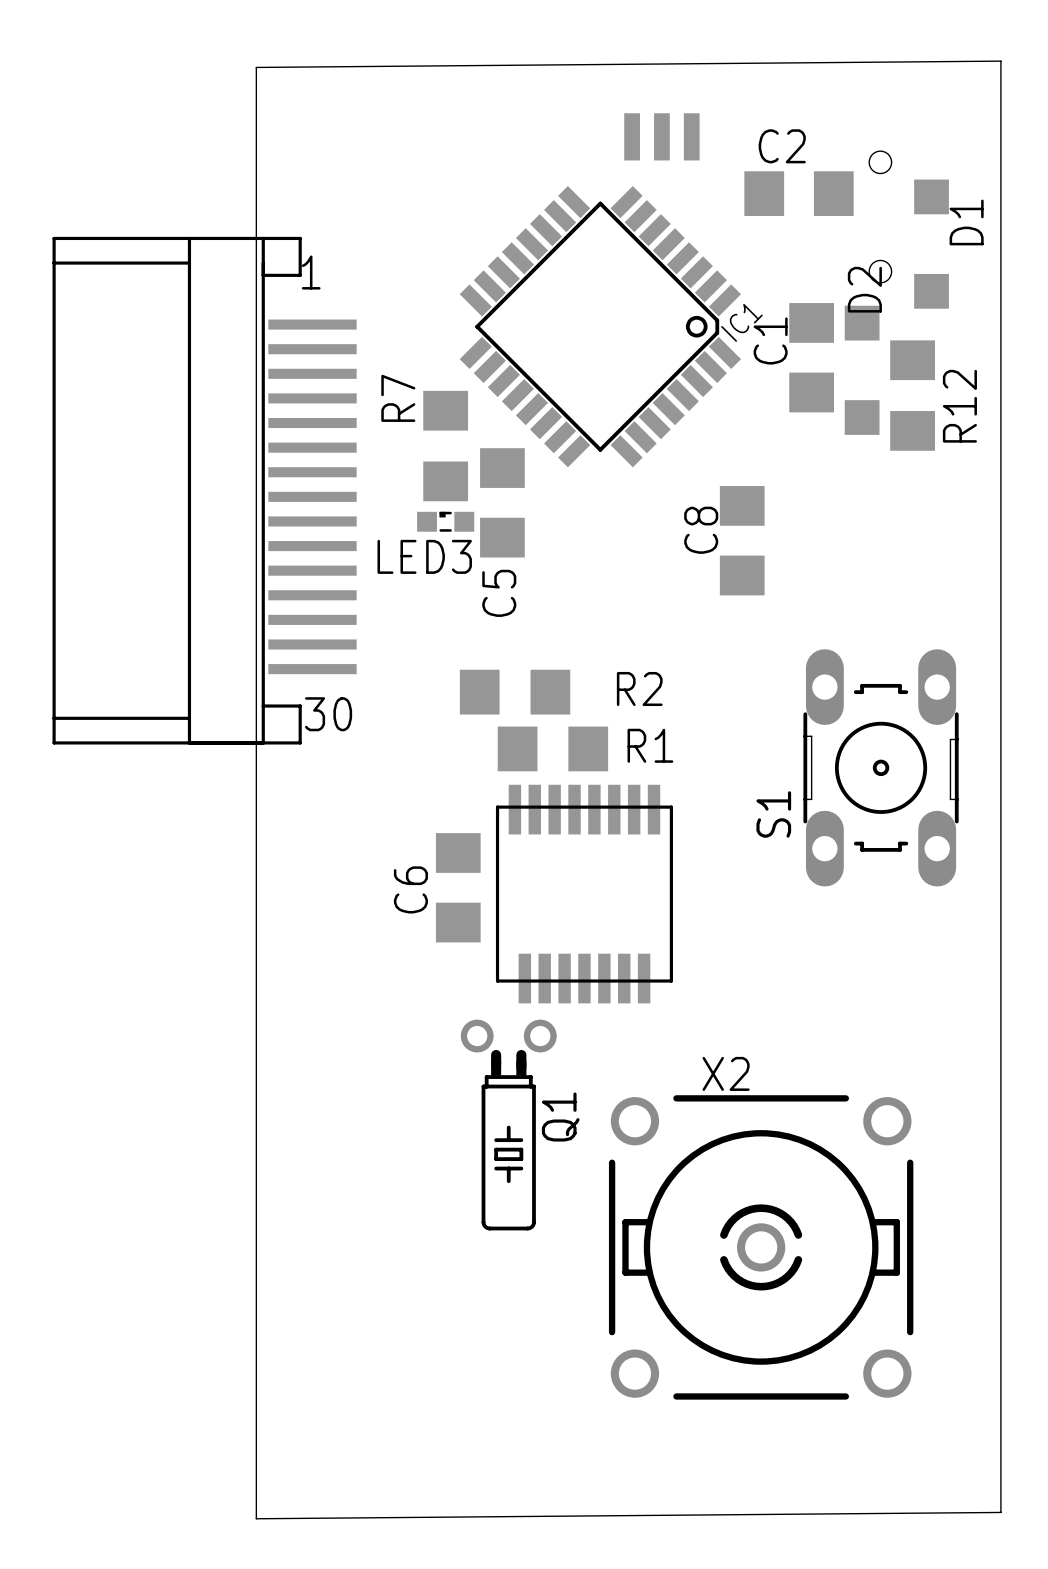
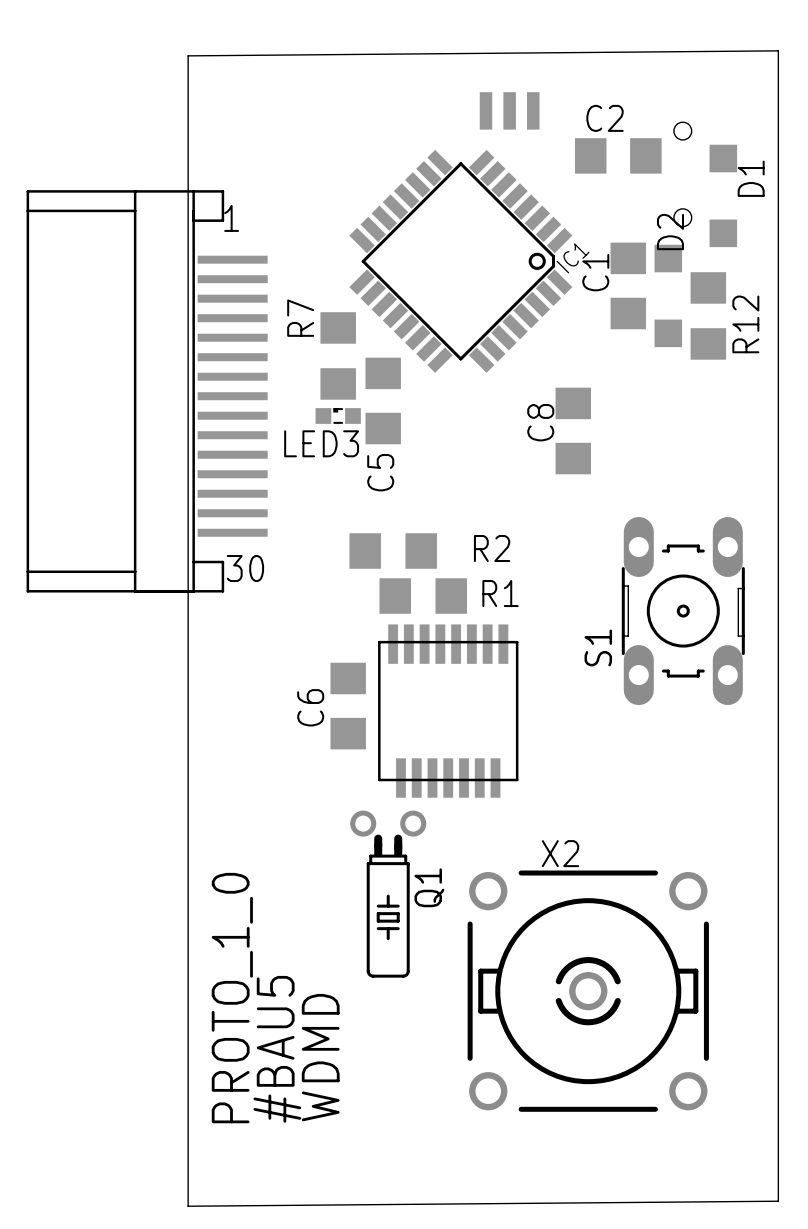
text: none -> PROTO_1_0 (232, 998)
text: none -> #BAU5 (277, 1049)
text: none -> WDMD (320, 1057)

